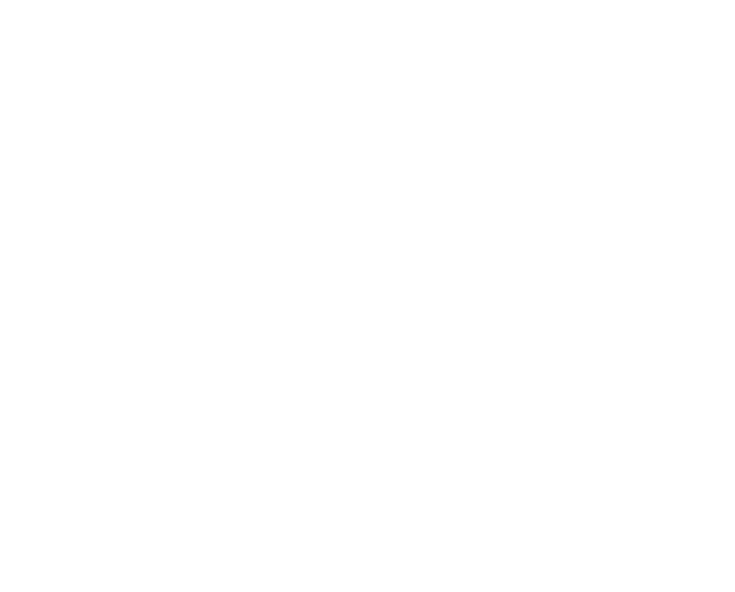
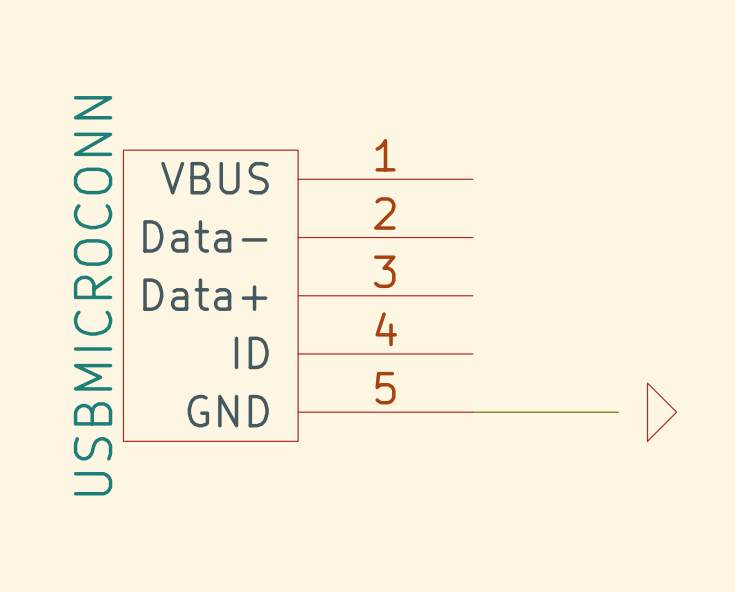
part: none -> USBMICROCONN (298, 295)
wire: none -> (472, 412) (618, 412)
power symbol: none -> (662, 412)

